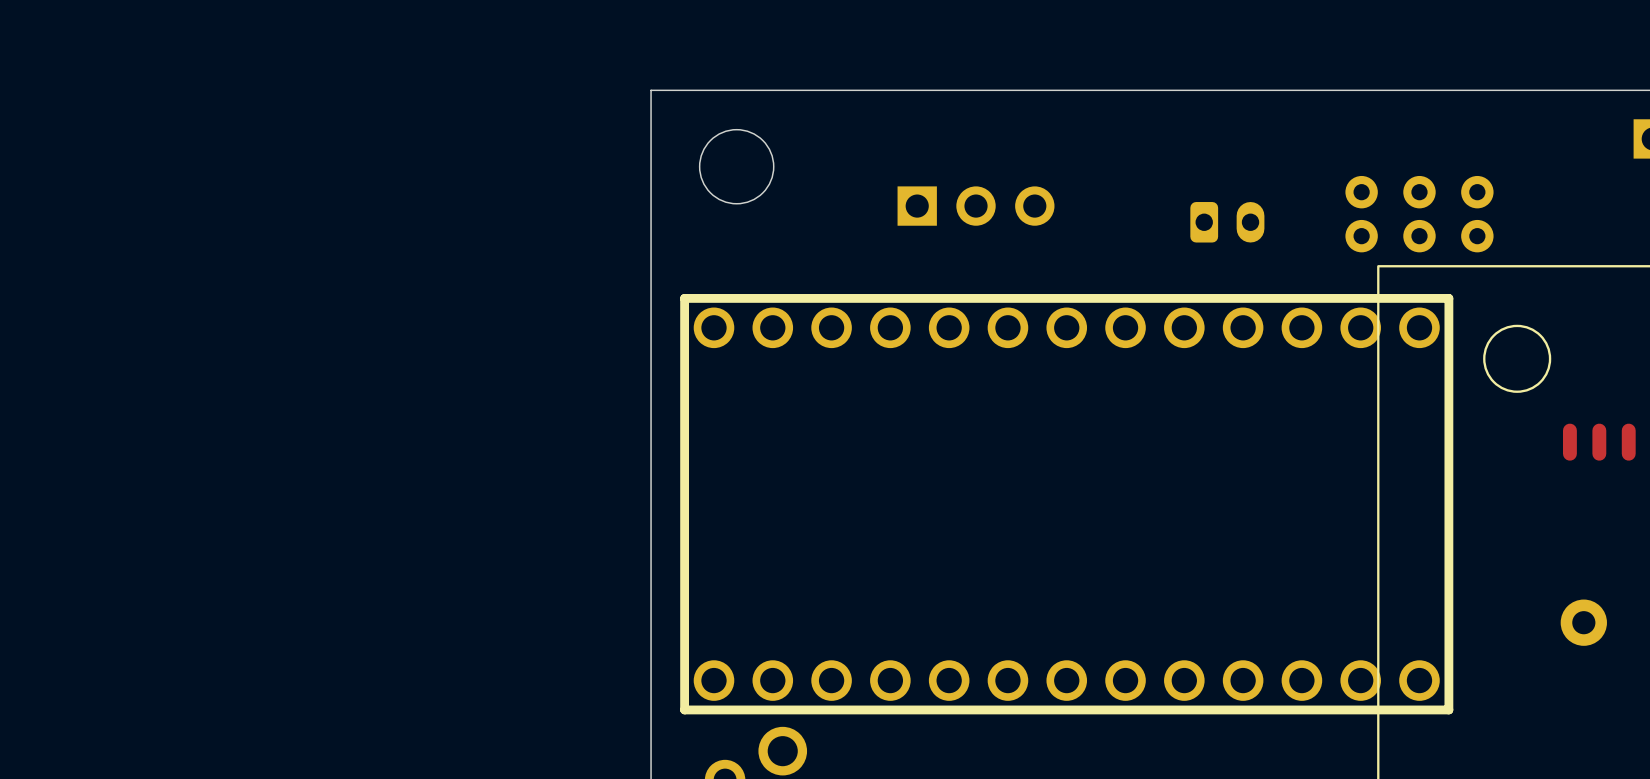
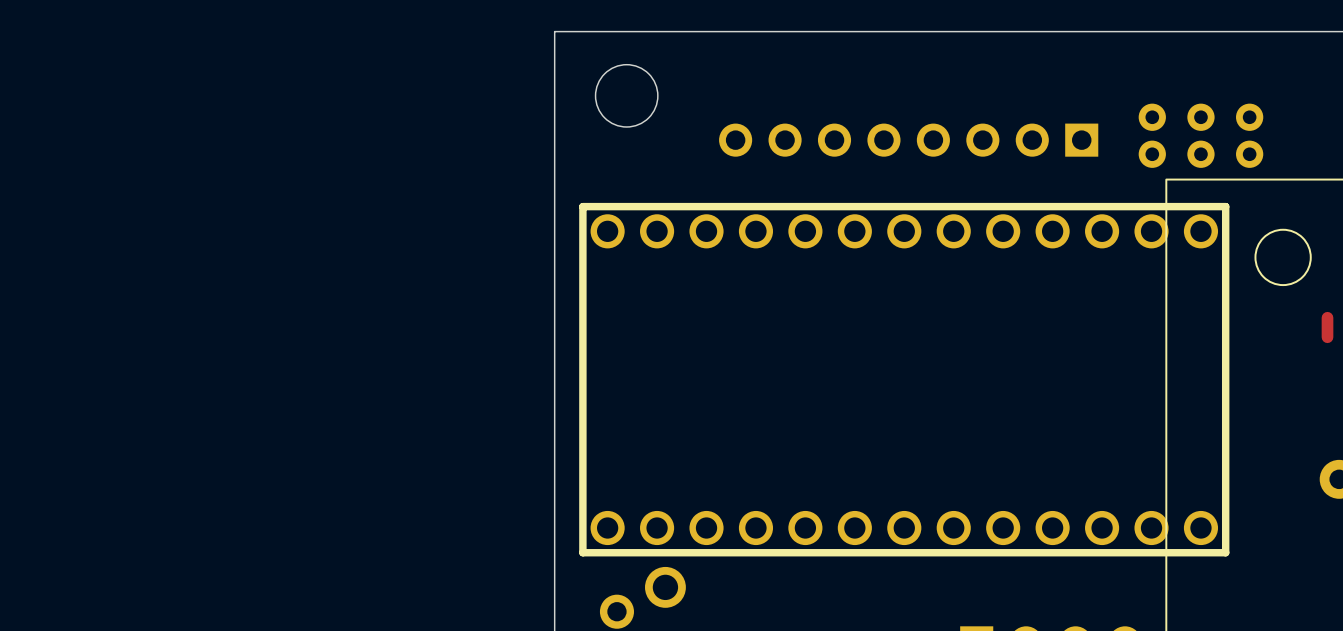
part: (976, 206) -> none
part: none -> (908, 140)
part: (1227, 222) -> none

